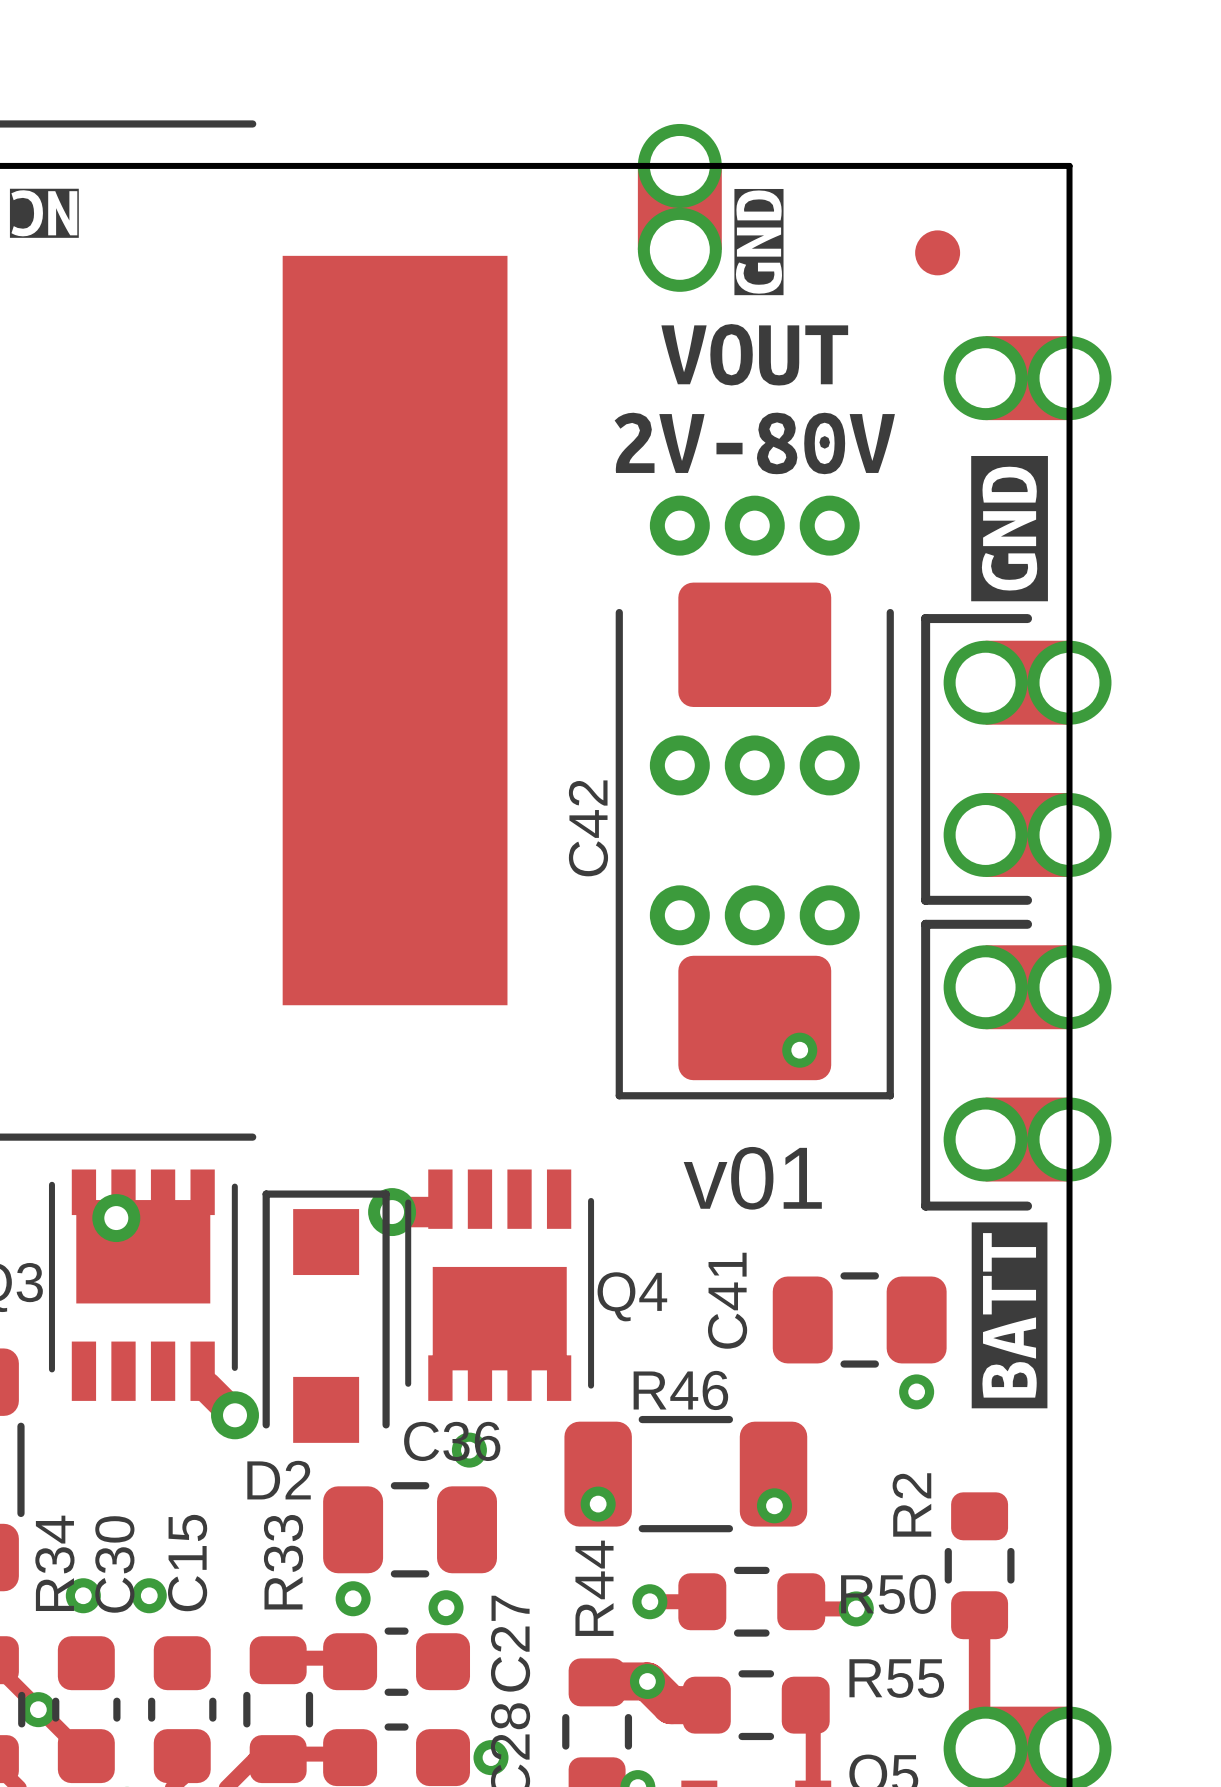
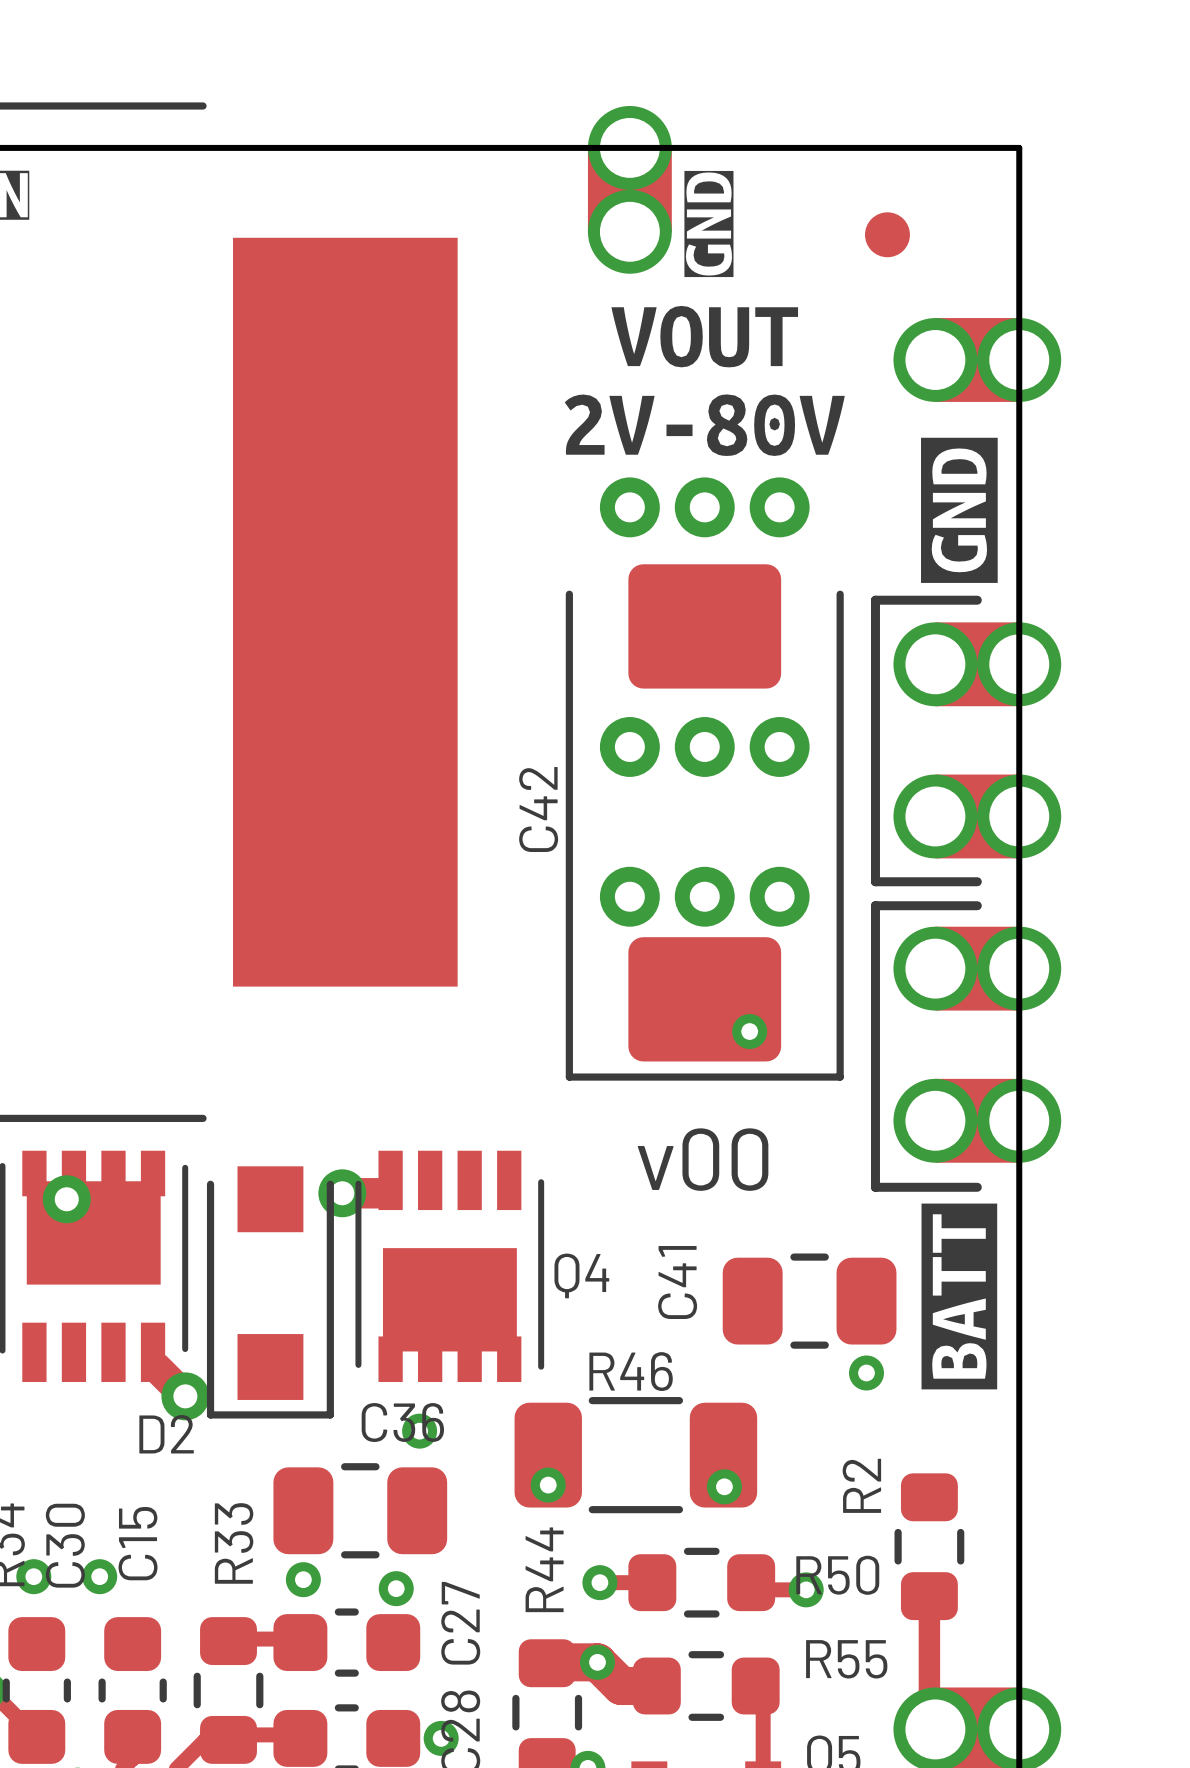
text: v01 (752, 1178) -> v00 (703, 1159)
D2 rotation: 0° (326, 1316) -> 180° (270, 1292)

